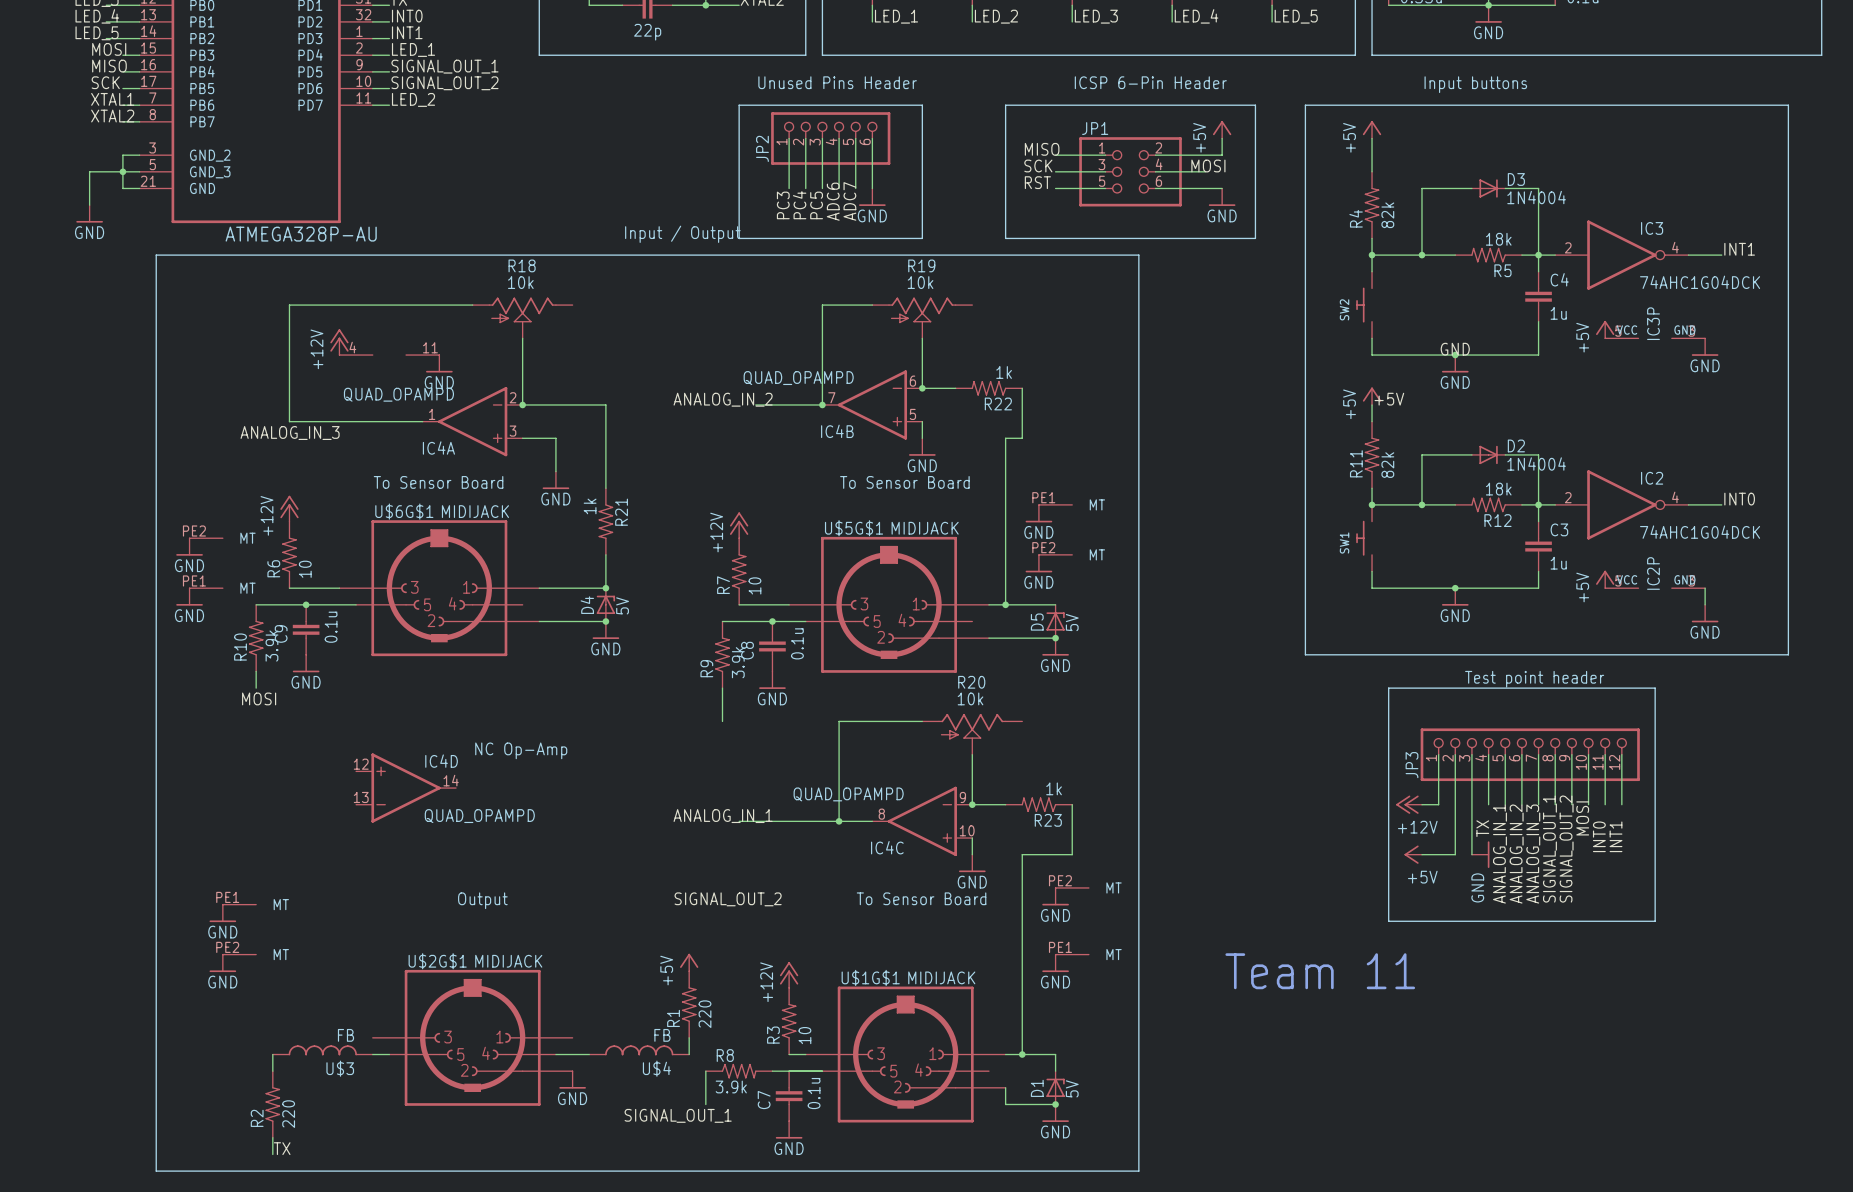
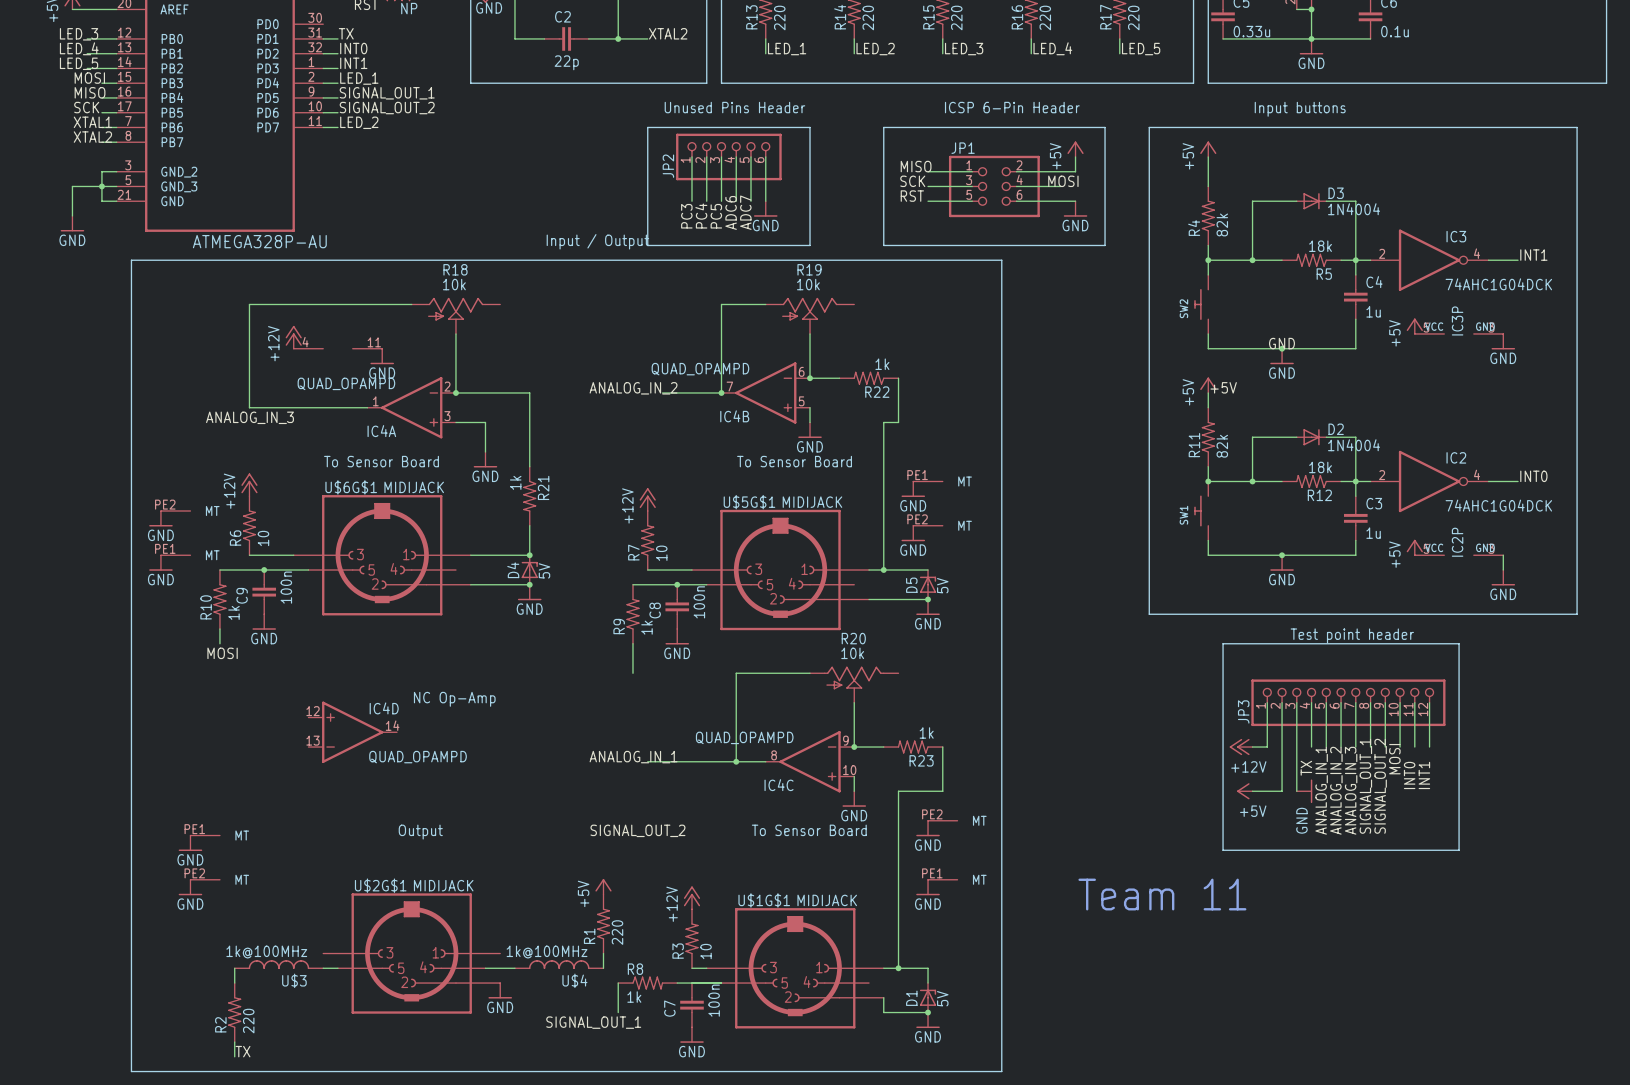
C9 value: 0.1u (331, 627) -> 100n (286, 587)
C8 value: 0.1u (797, 643) -> 100n (699, 602)
R10 value: 3.9k (271, 646) -> 1k (233, 612)
R9 value: 3.9k (738, 662) -> 1k (647, 627)
U$3 value: FB (345, 1035) -> 1k@100MHz (266, 952)
U$4 value: FB (662, 1035) -> 1k@100MHz (547, 952)
R8 value: 3.9k (731, 1086) -> 1k (634, 997)
C7 value: 0.1u (814, 1093) -> 100n (714, 1000)

